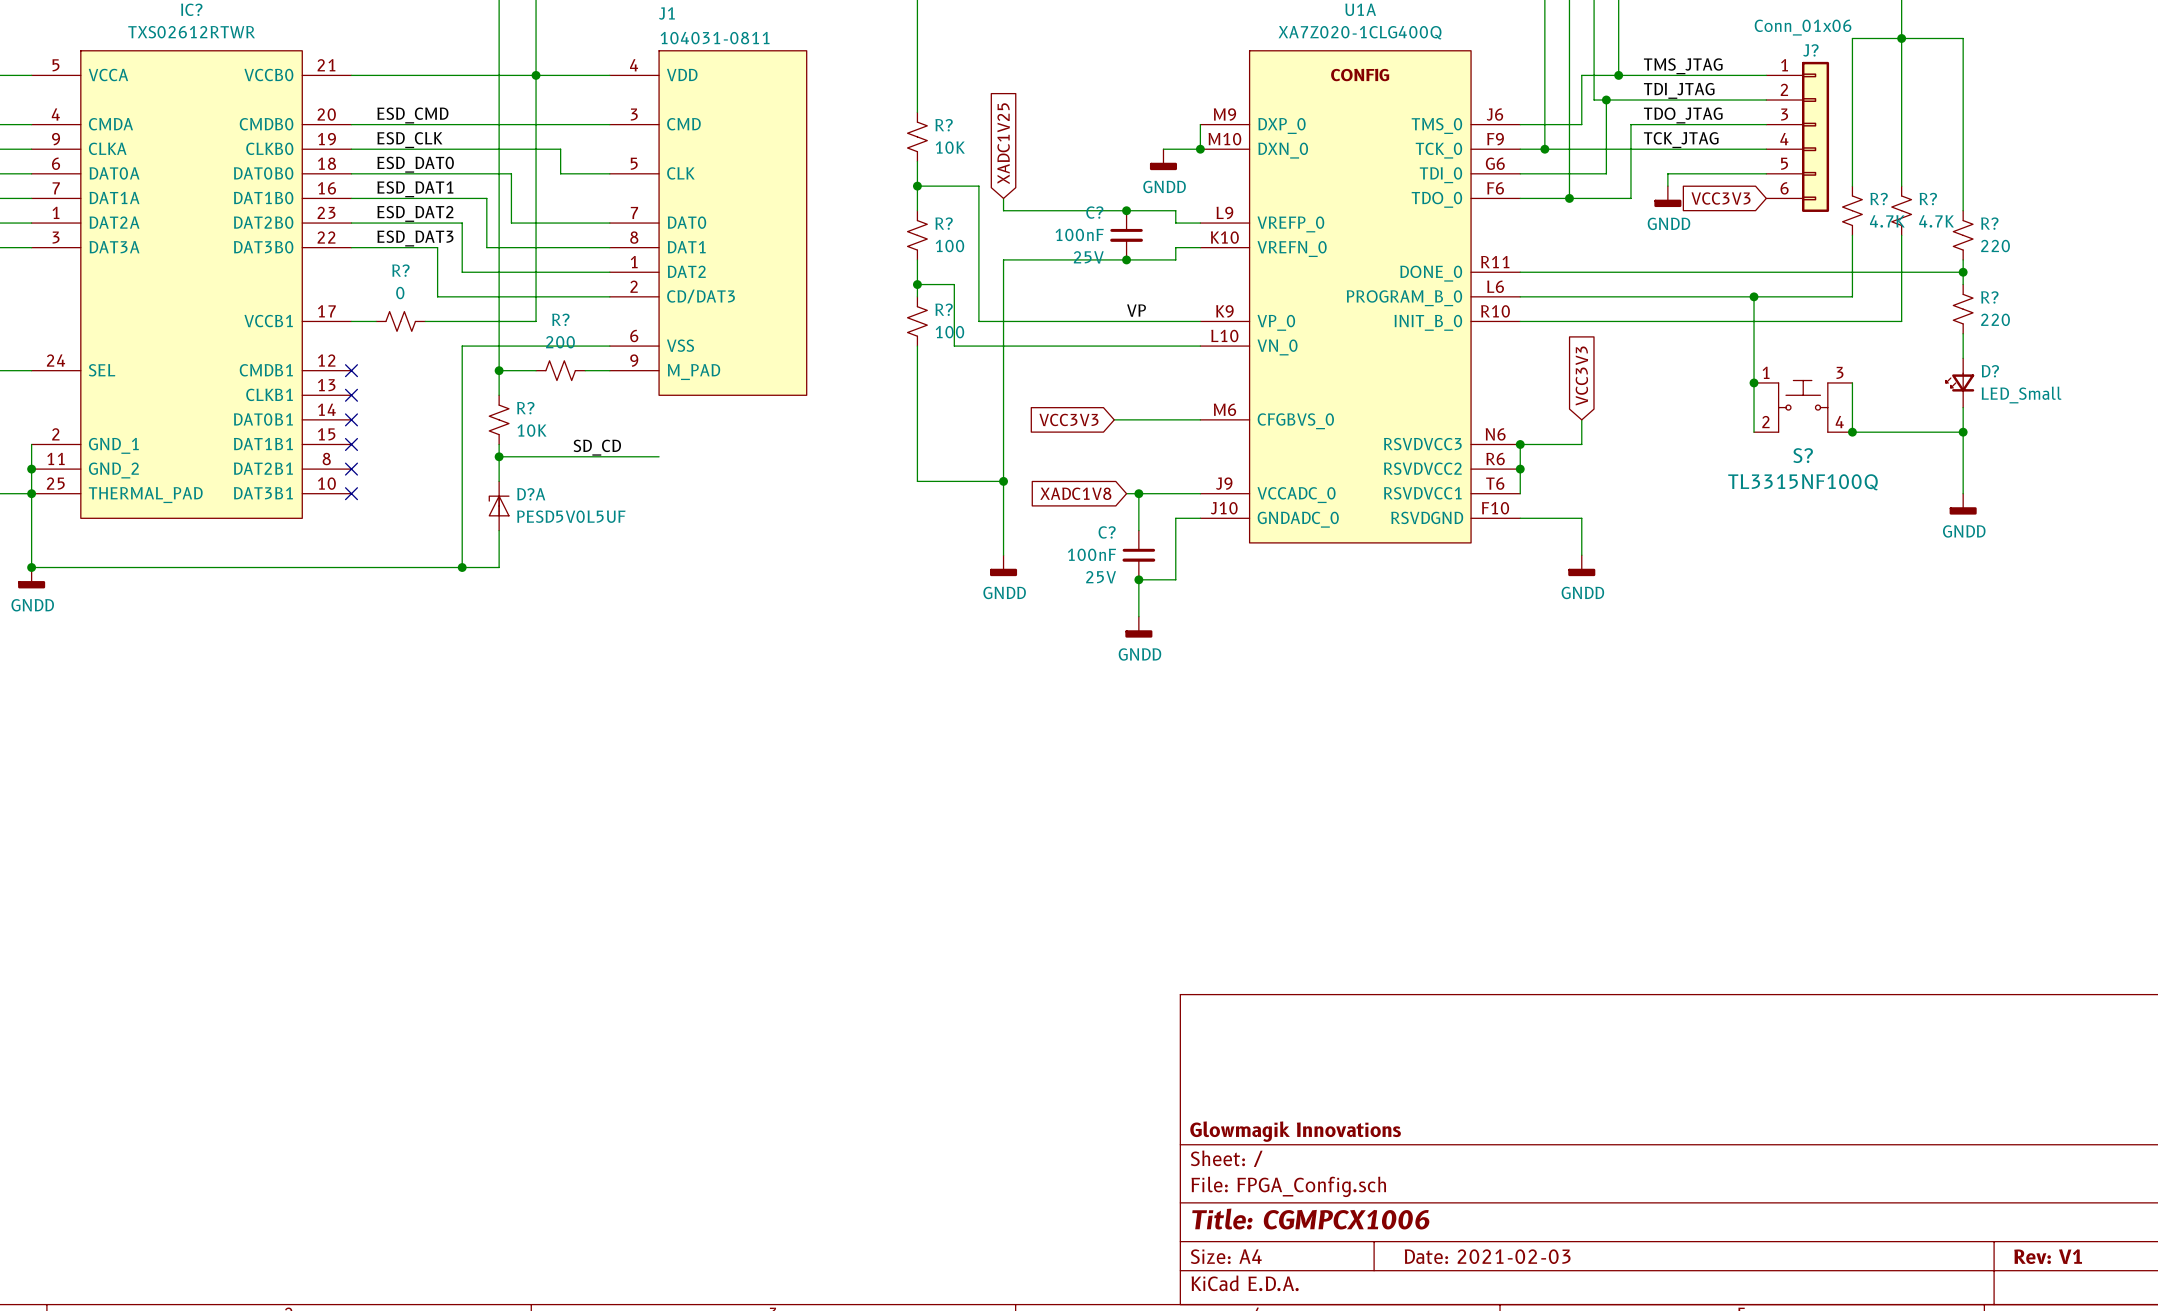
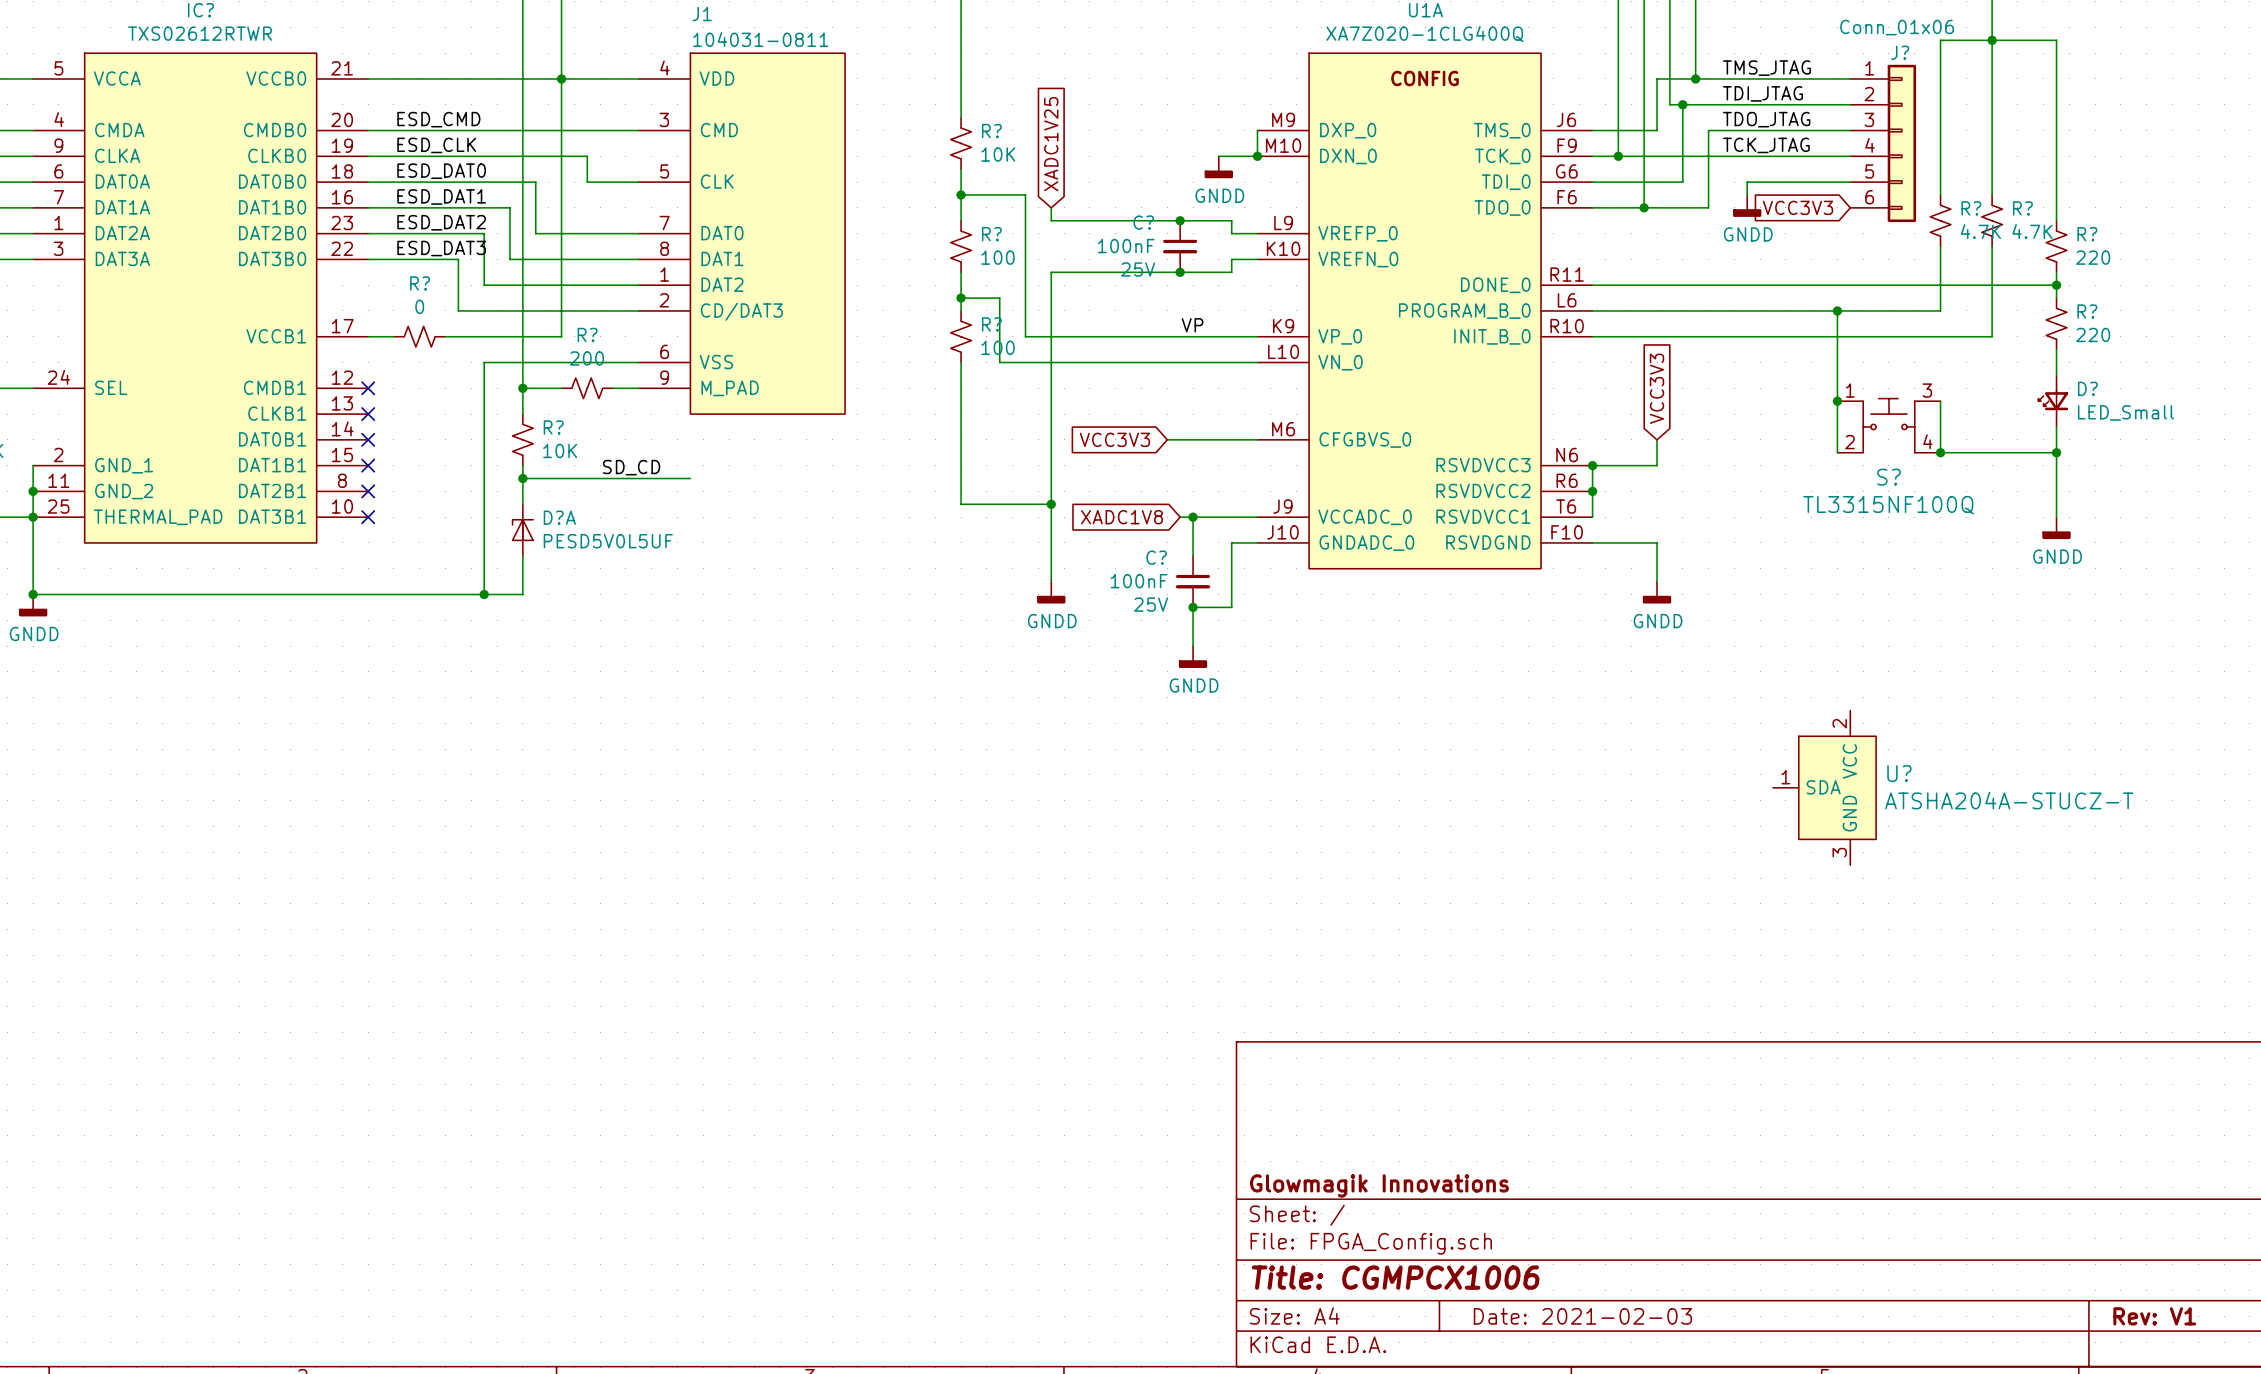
U?: none -> ATSHA204A-STUCZ-T (1824, 787)

